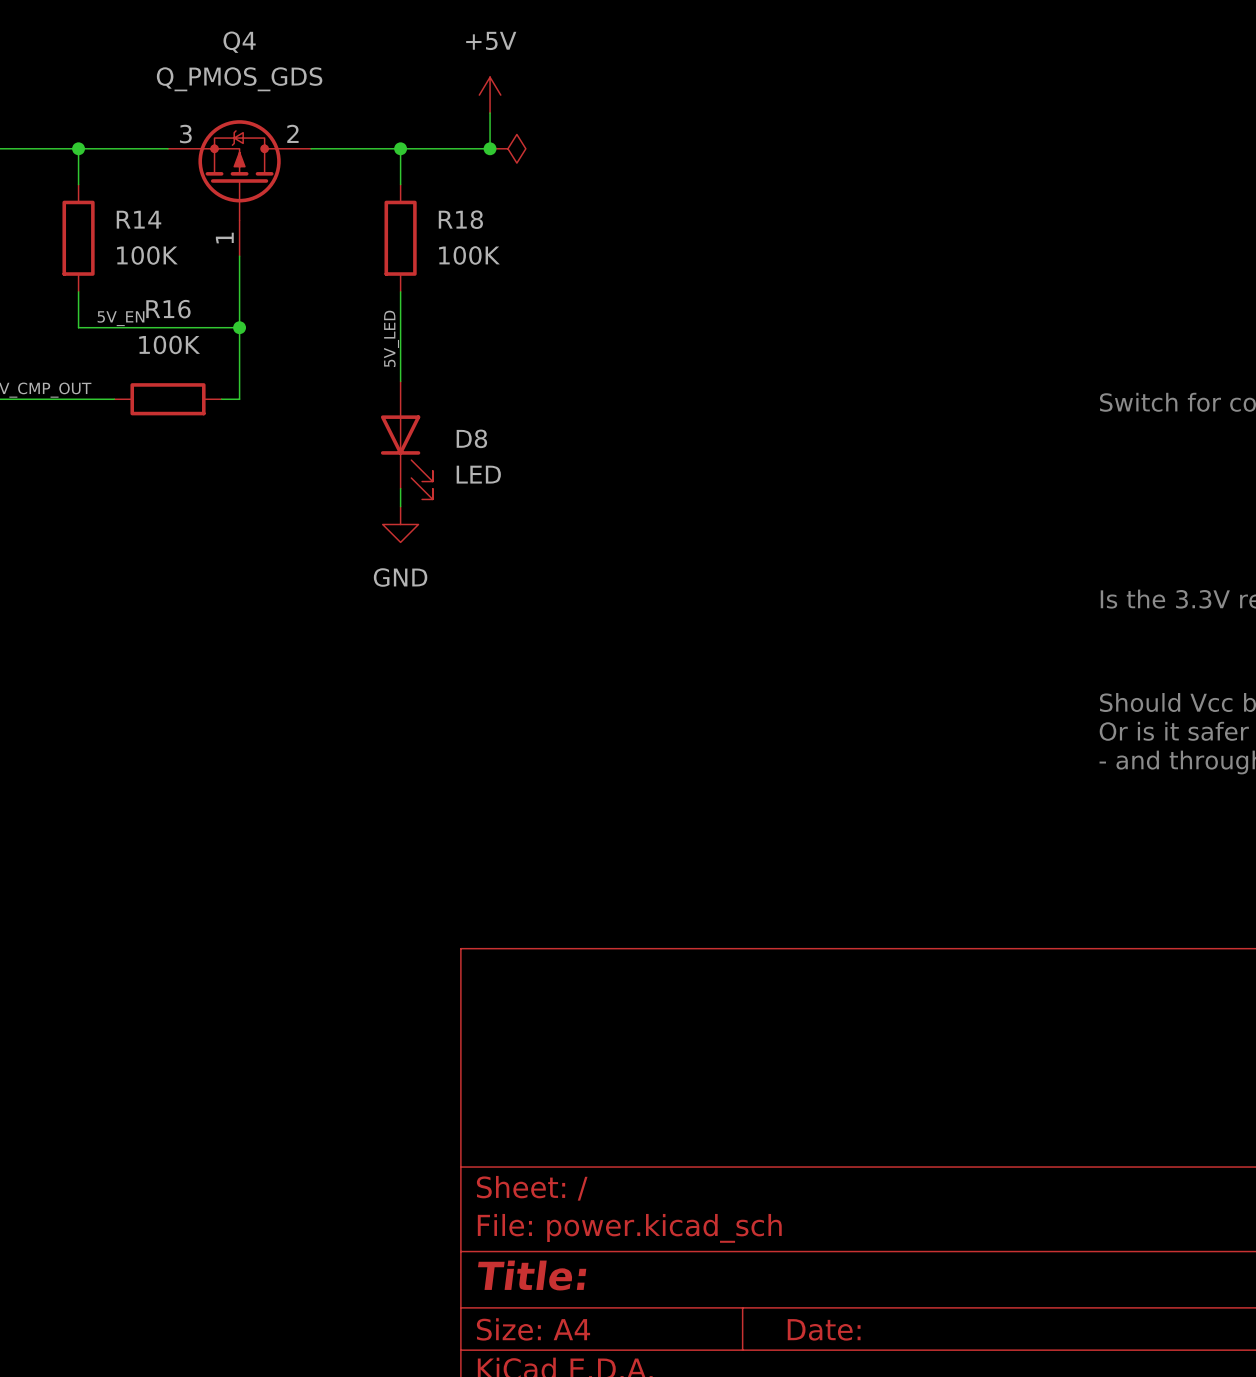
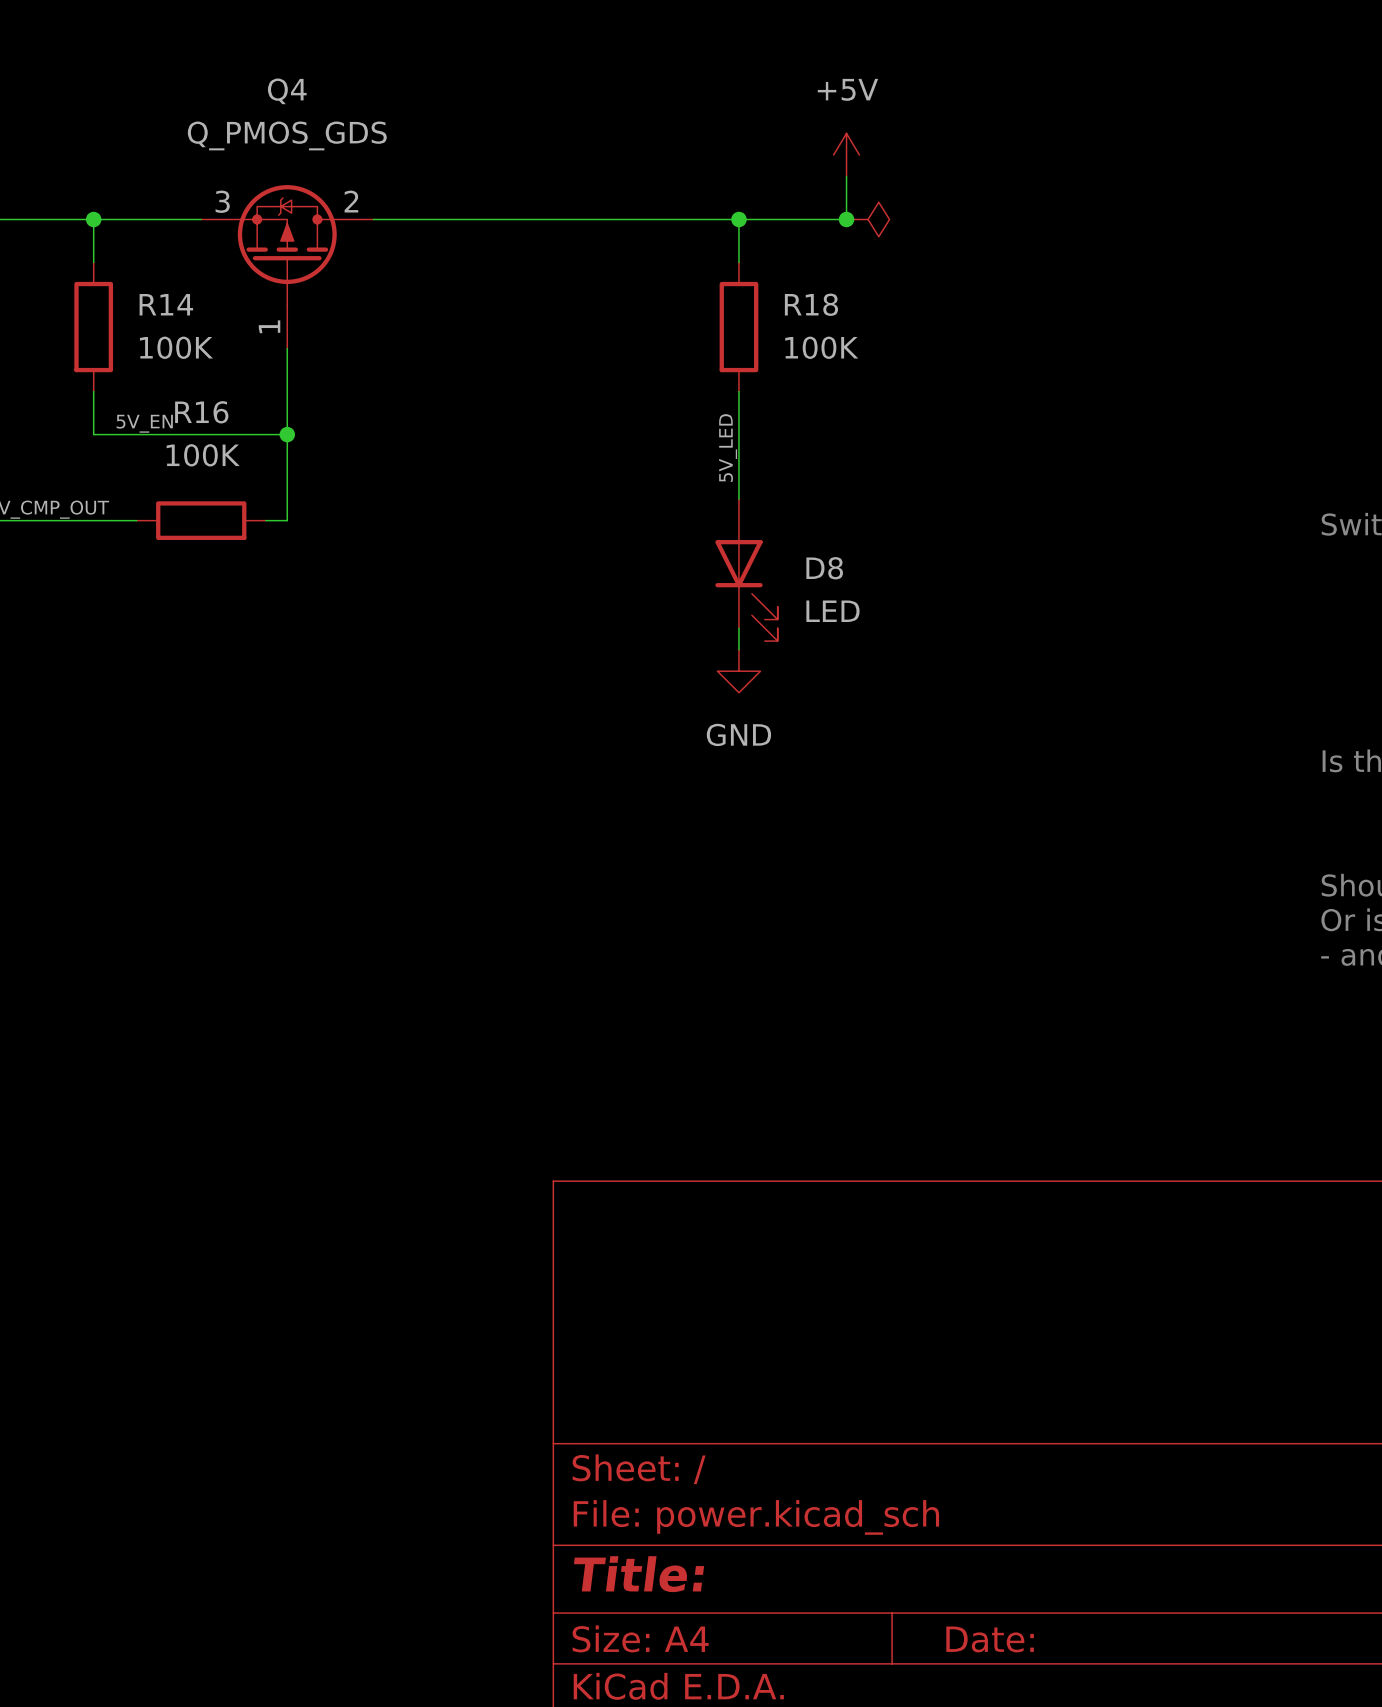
power symbol position: +5V (490, 95) -> +5V (846, 154)
wire: (490, 113) (490, 148) -> (846, 176) (846, 219) (588, 219)
wire: (400, 148) (400, 184) -> (738, 219) (738, 262)
junction: (400, 148) -> none
junction: (490, 148) -> none
power symbol position: (507, 148) -> (868, 219)
junction: none -> (738, 219)
junction: none -> (846, 219)
R18 position: (400, 238) -> (738, 327)
wire: (400, 291) (400, 381) -> (738, 391) (738, 499)
label position: 5V_LED (391, 338) -> 5V_LED (728, 448)
D8 position: (406, 440) -> (746, 570)
wire: (400, 488) (400, 506) -> (738, 628) (738, 649)
power symbol position: GND (400, 524) -> GND (738, 671)

